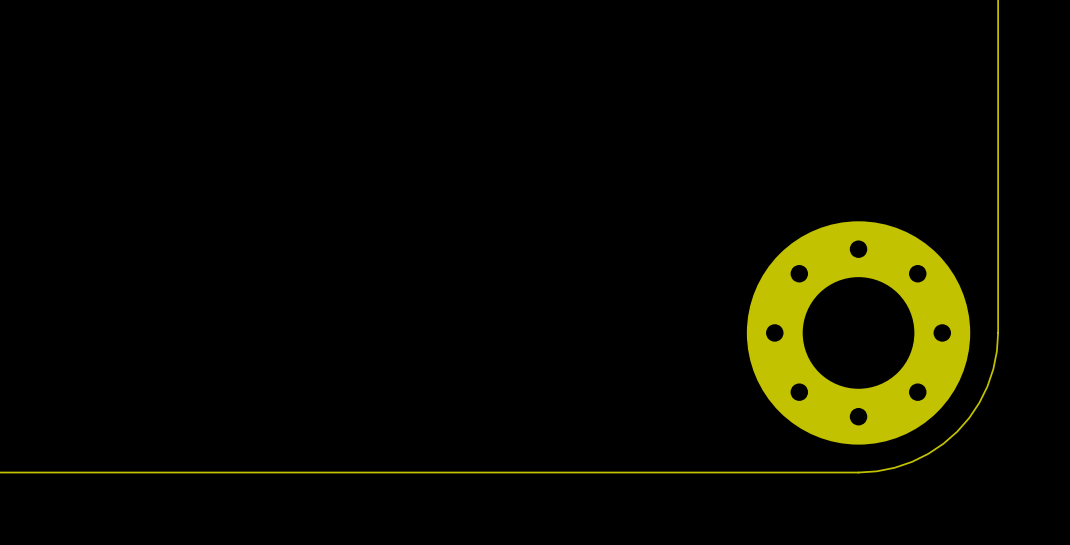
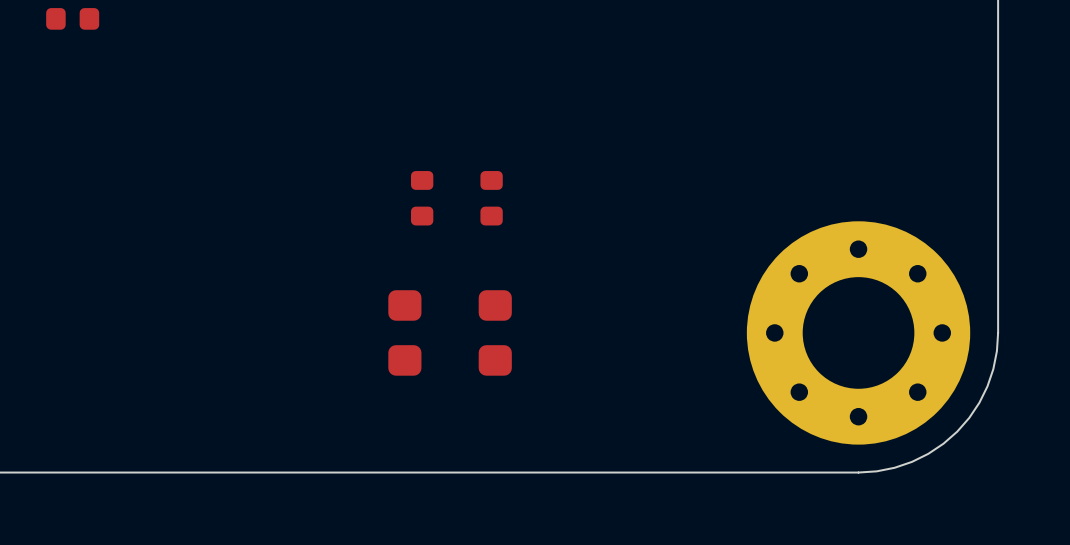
part: none -> (72, 18)
part: none -> (422, 198)
part: none -> (491, 198)
part: none -> (404, 332)
part: none -> (495, 332)

